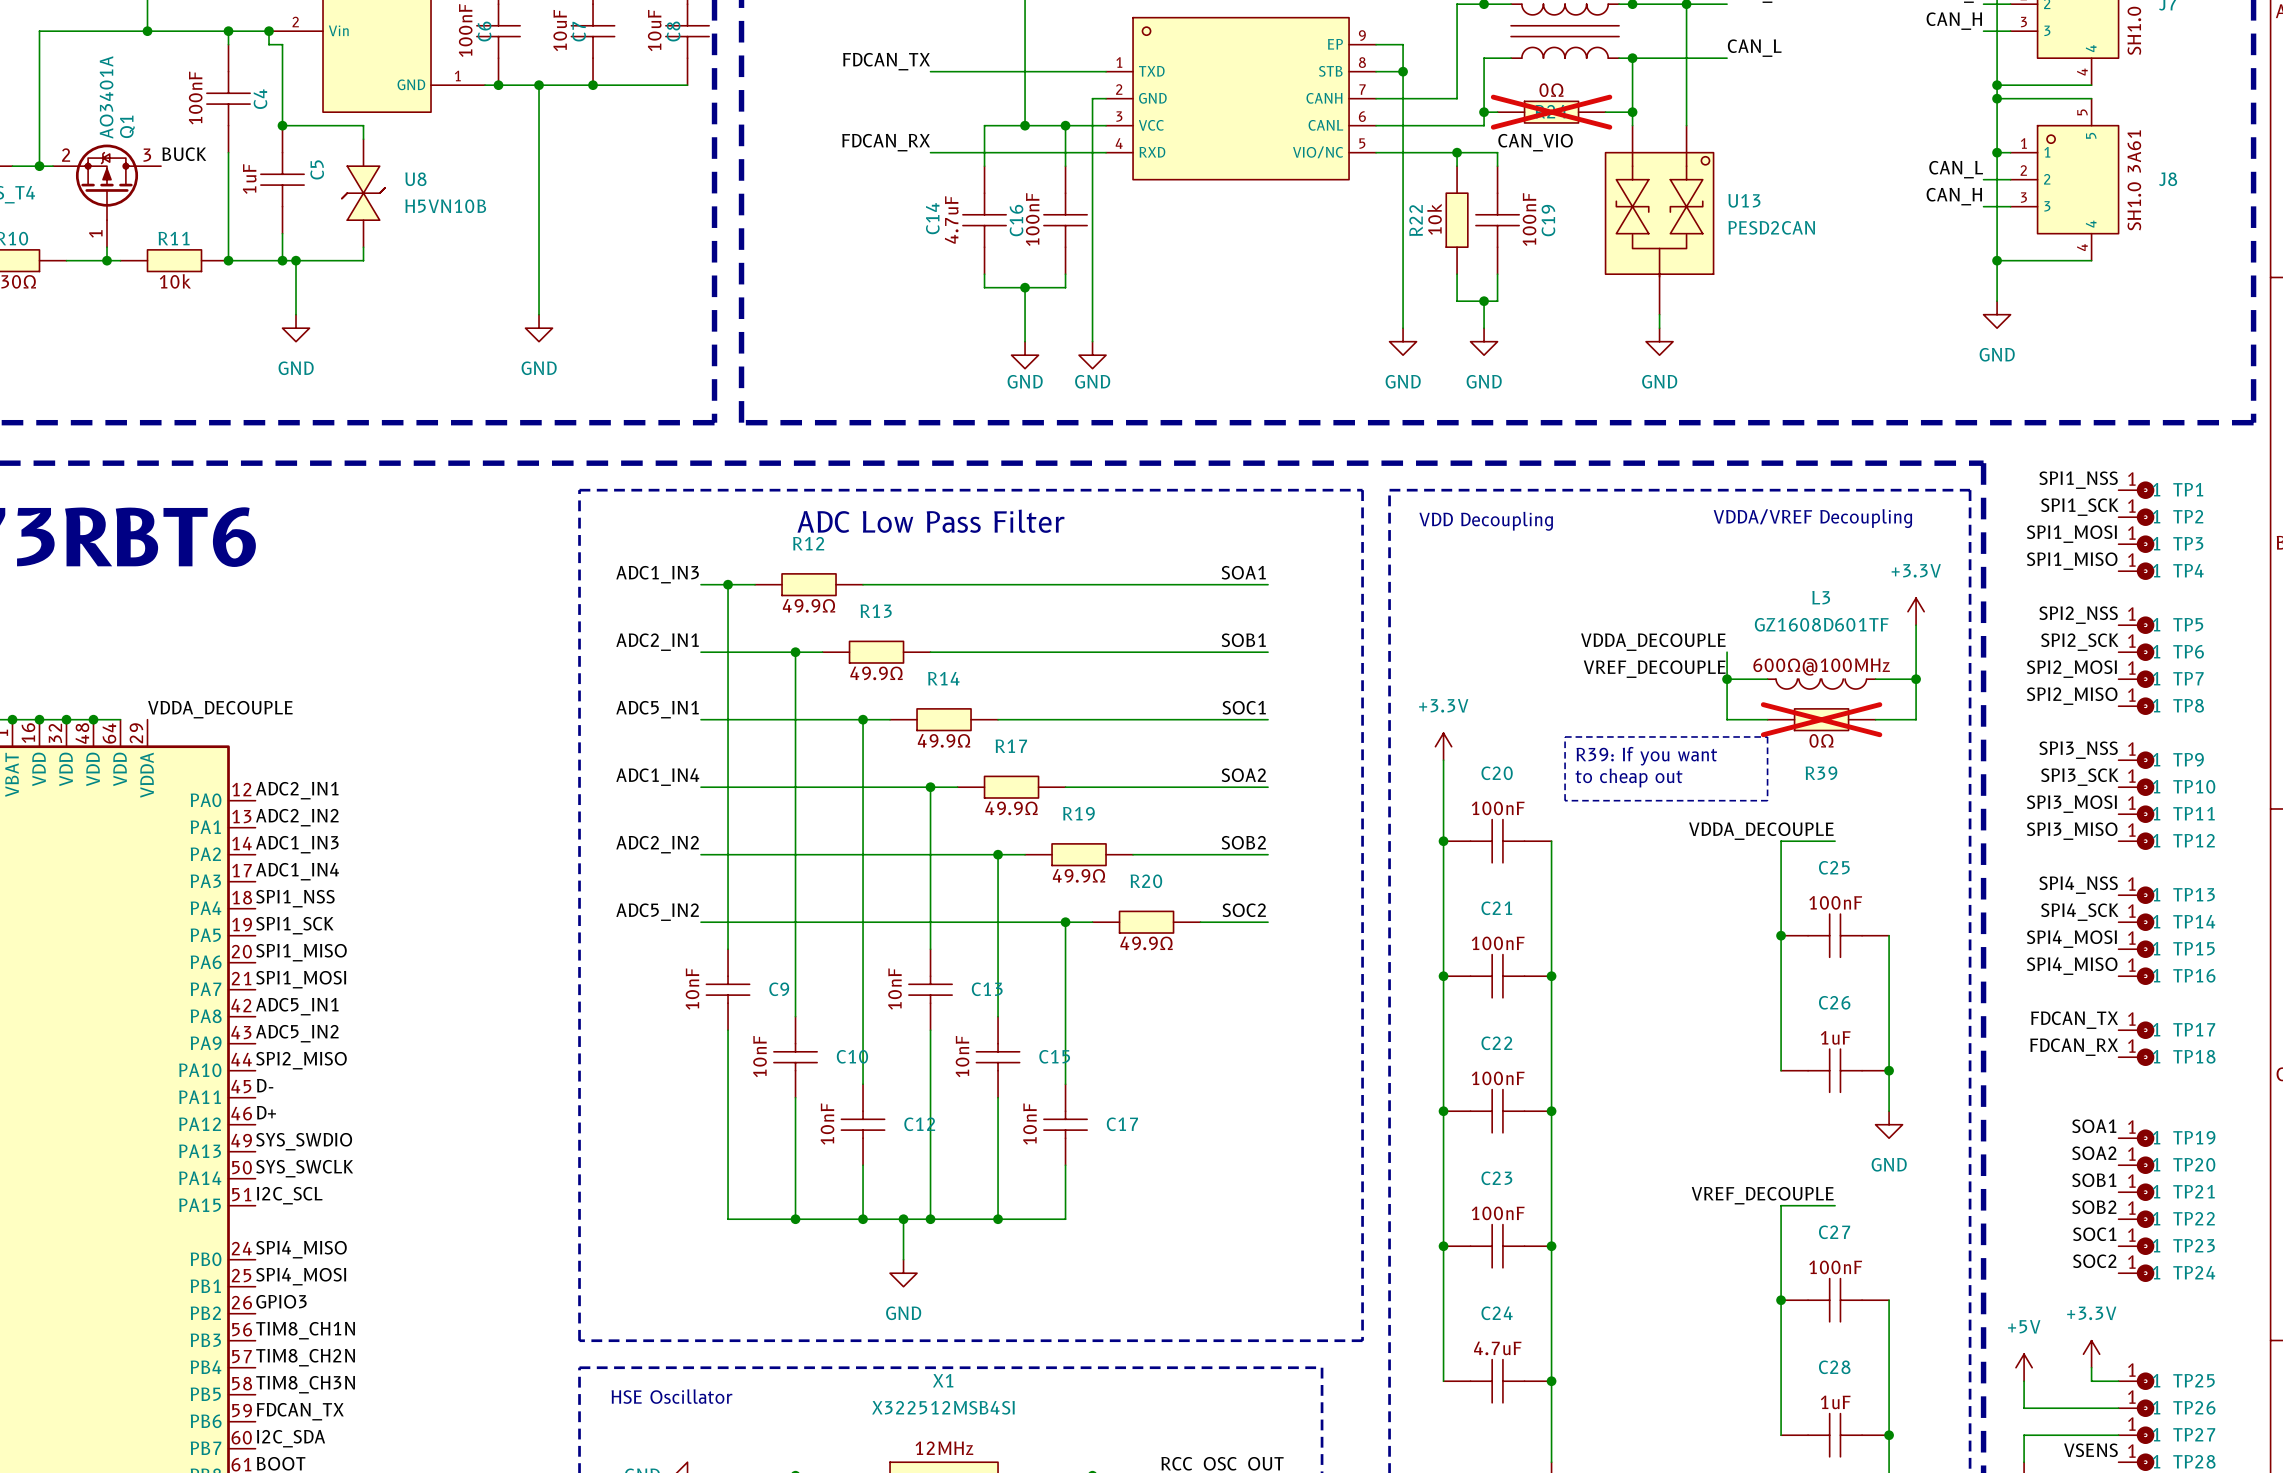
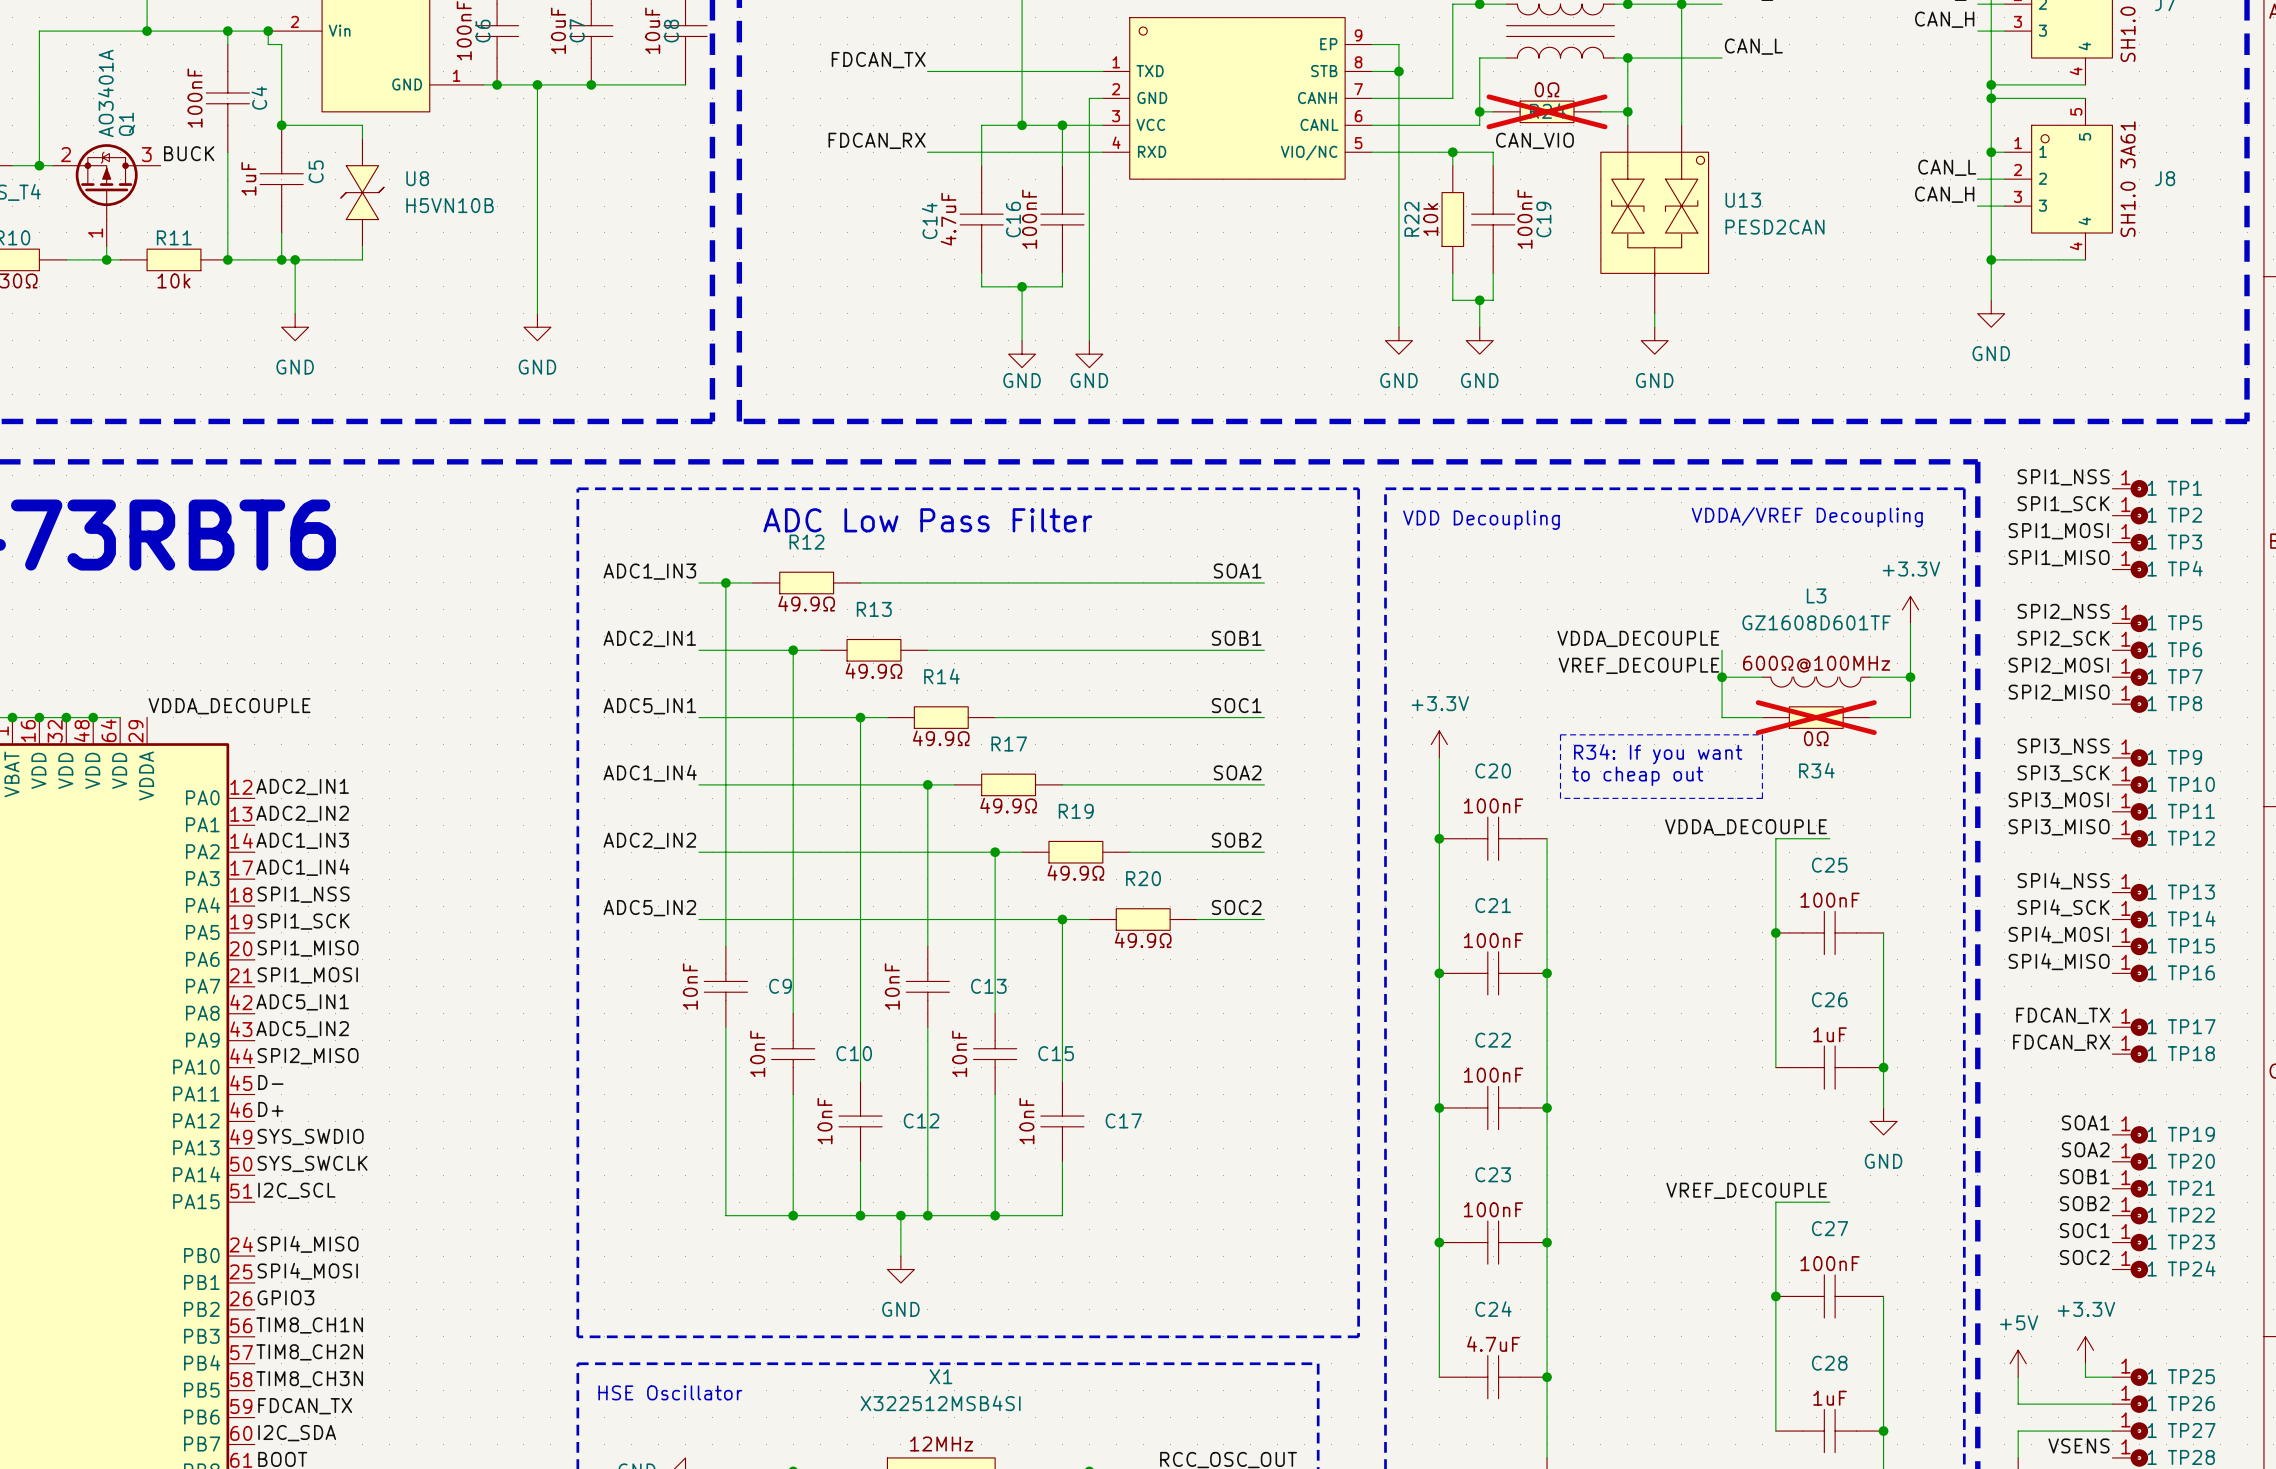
text: R39: If you want (1646, 756) -> R34: If you want (1658, 754)
R39 name: R39 (1821, 773) -> R34 (1816, 770)

